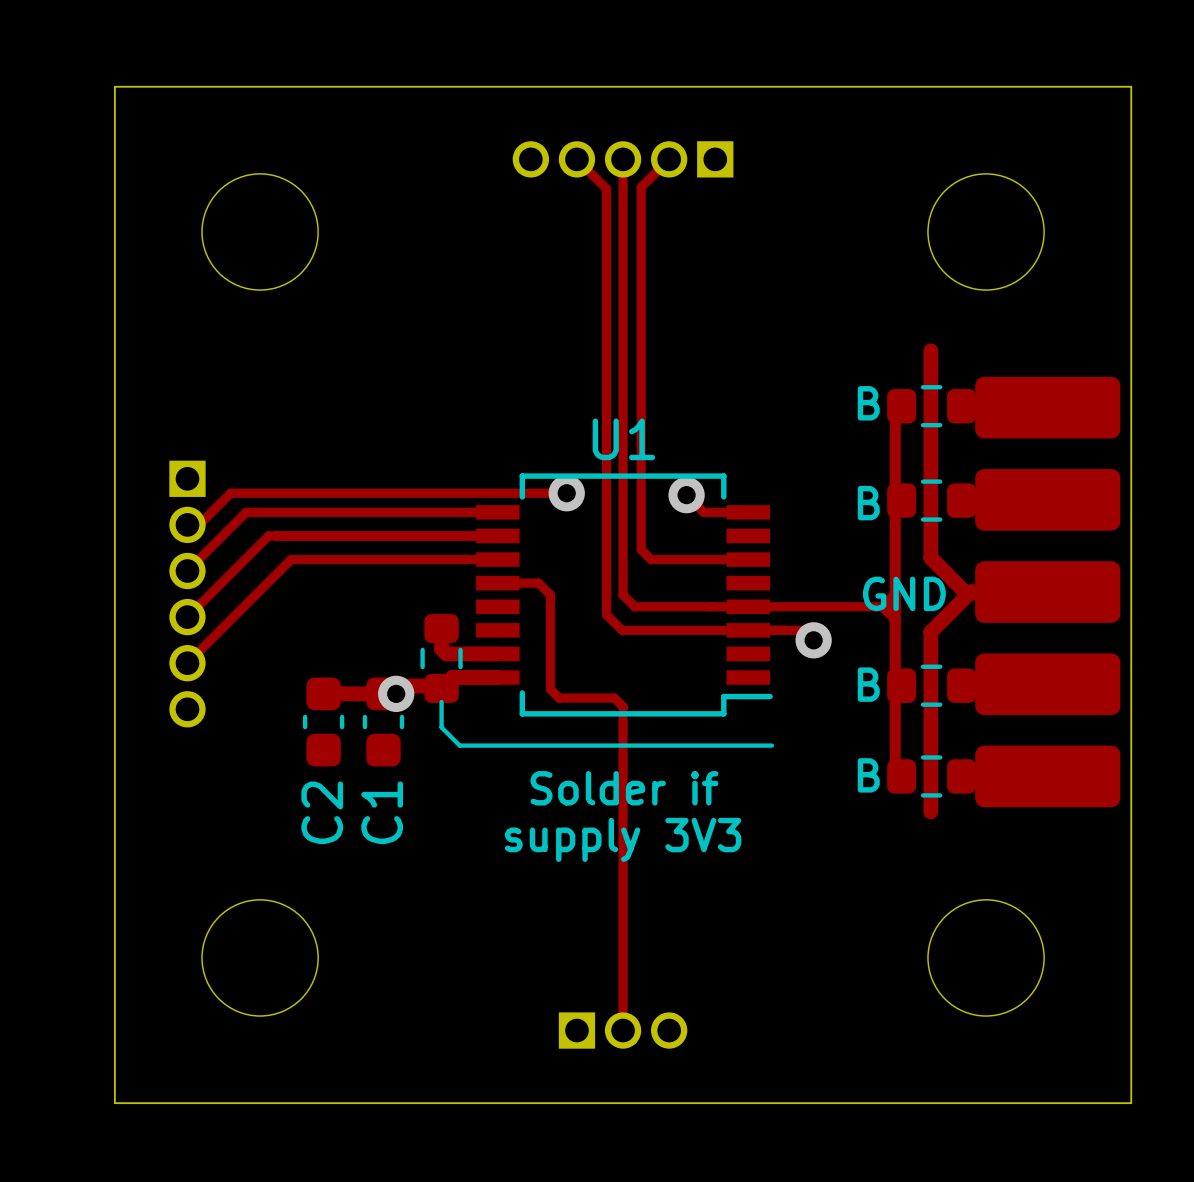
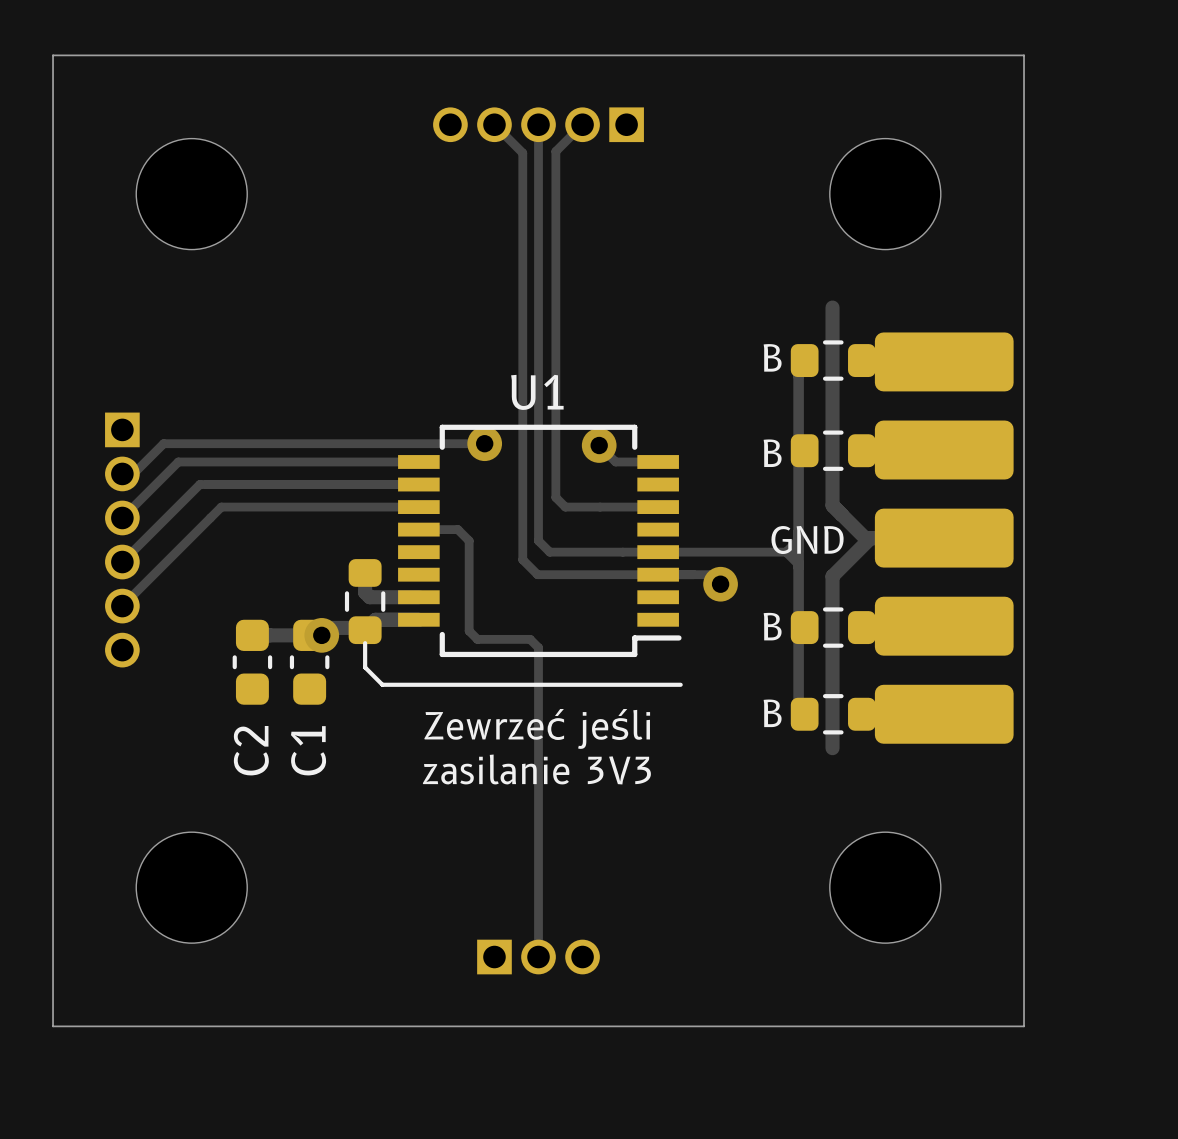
text: Solder if (624, 788) -> Zewrzeć jeśli (537, 728)
text: supply 3V3 (623, 839) -> zasilanie 3V3 (536, 769)

